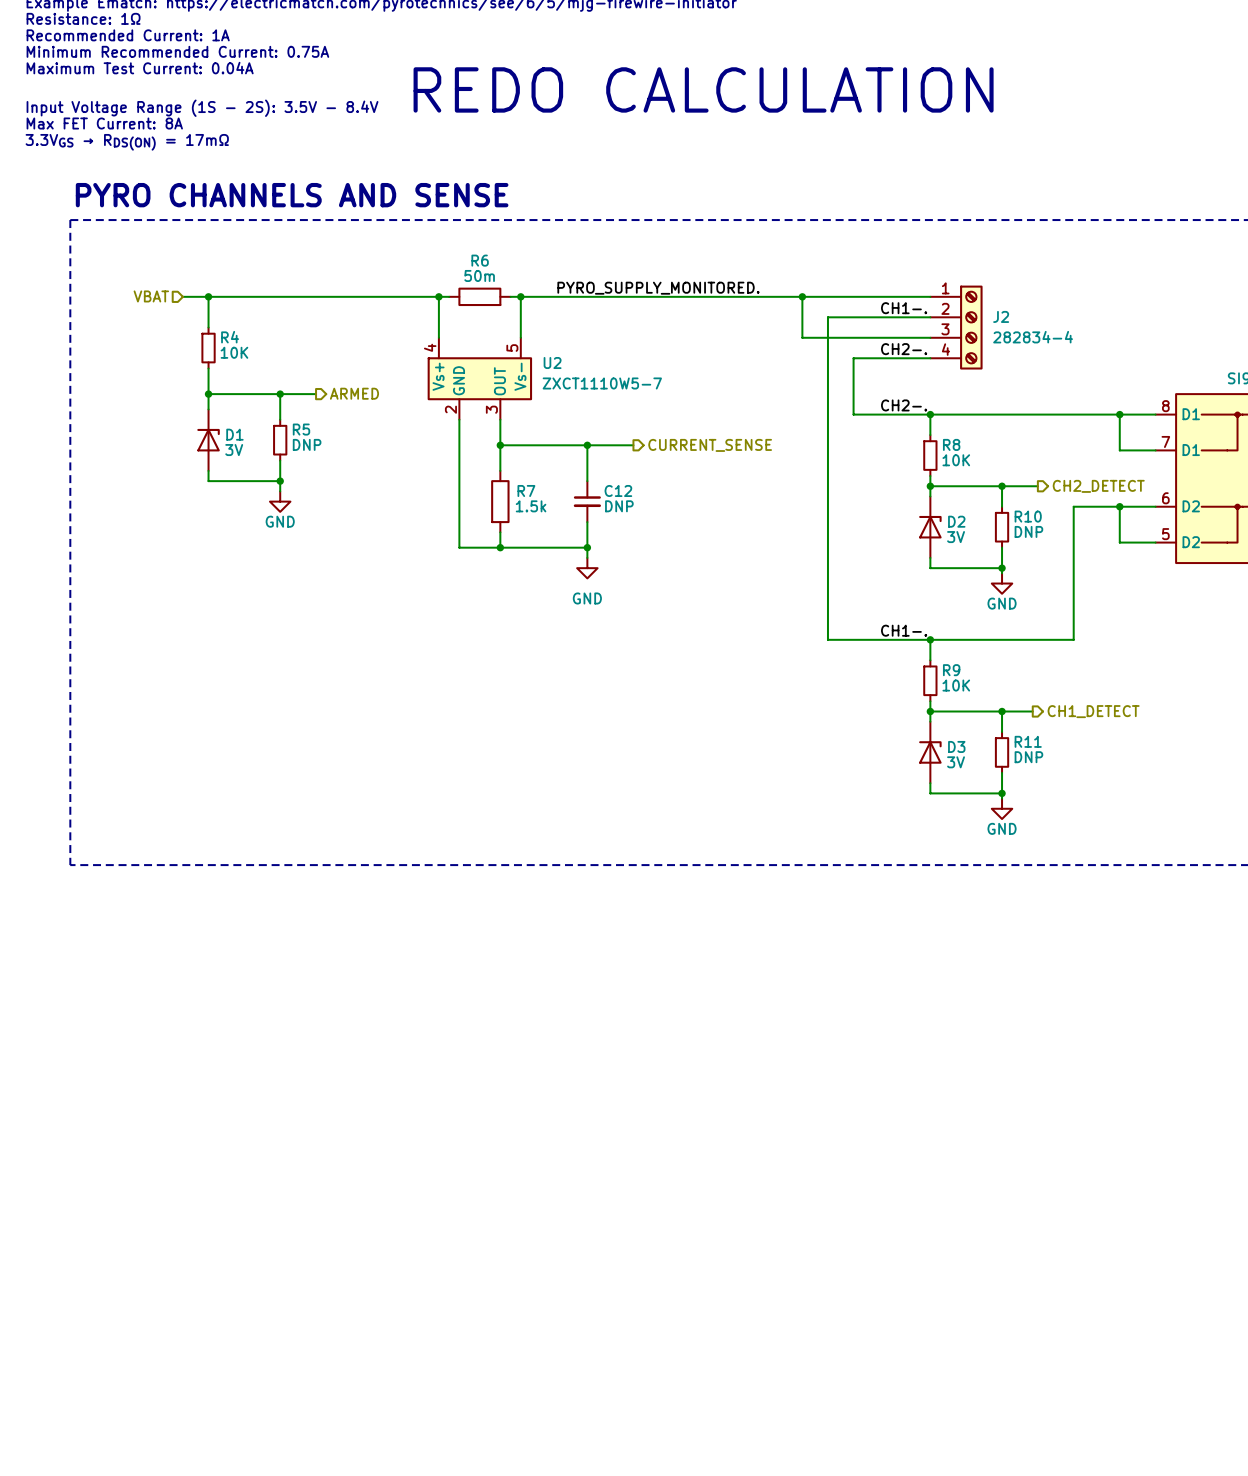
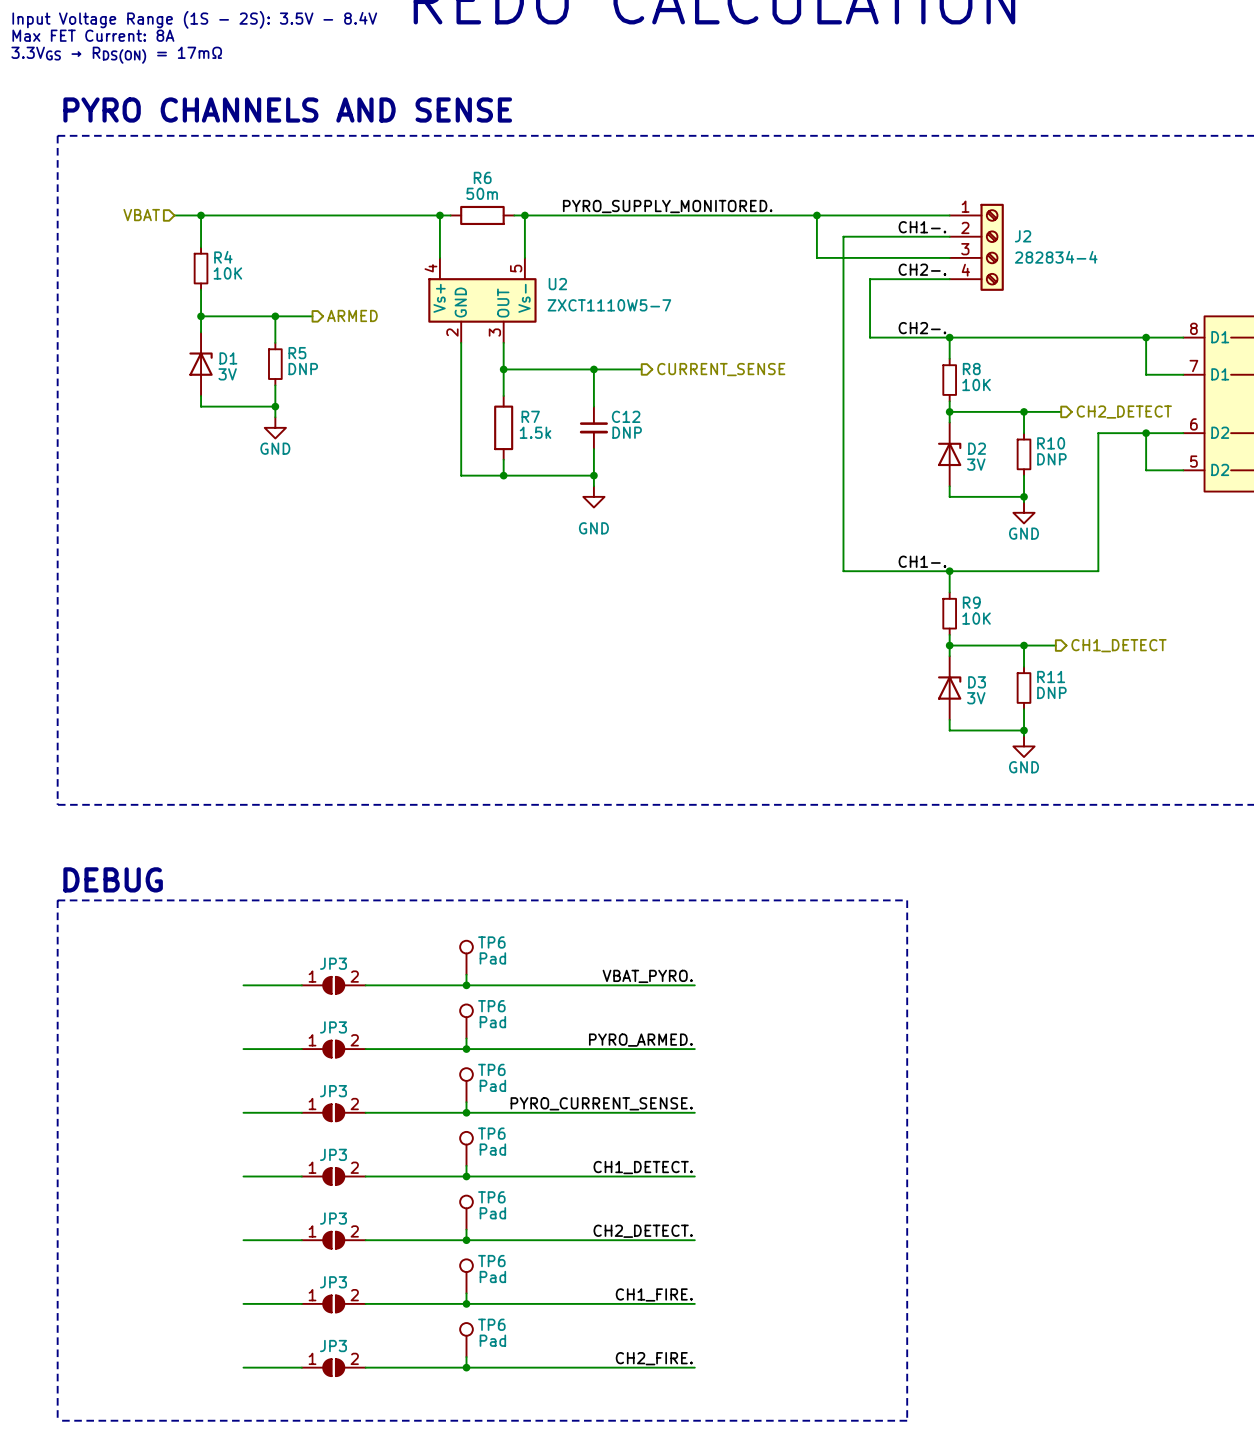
text: none -> DEBUG (113, 879)
line: none -> (57, 900) (907, 900) (907, 1420) (57, 1420) (57, 900)
TP6: none -> Pad (466, 957)
wire: none -> (466, 974) (466, 985)
label: none -> VBAT_PYRO. (647, 976)
wire: none -> (243, 985) (301, 985)
JP3: none -> (333, 985)
wire: none -> (365, 985) (694, 985)
junction: none -> (466, 985)
TP6: none -> Pad (466, 1021)
wire: none -> (466, 1038) (466, 1049)
label: none -> PYRO_ARMED. (640, 1040)
wire: none -> (243, 1049) (301, 1049)
JP3: none -> (333, 1049)
wire: none -> (365, 1049) (694, 1049)
junction: none -> (466, 1049)
TP6: none -> Pad (466, 1085)
wire: none -> (466, 1102) (466, 1112)
label: none -> PYRO_CURRENT_SENSE. (601, 1103)
wire: none -> (243, 1112) (301, 1112)
JP3: none -> (333, 1112)
wire: none -> (365, 1112) (694, 1112)
junction: none -> (466, 1112)
TP6: none -> Pad (466, 1148)
wire: none -> (466, 1165) (466, 1176)
label: none -> CH1_DETECT. (643, 1167)
wire: none -> (243, 1176) (301, 1176)
JP3: none -> (333, 1176)
wire: none -> (365, 1176) (694, 1176)
junction: none -> (466, 1176)
TP6: none -> Pad (466, 1212)
wire: none -> (466, 1229) (466, 1240)
label: none -> CH2_DETECT. (643, 1231)
wire: none -> (243, 1240) (301, 1240)
JP3: none -> (333, 1240)
wire: none -> (365, 1240) (694, 1240)
junction: none -> (466, 1240)
TP6: none -> Pad (466, 1276)
wire: none -> (466, 1293) (466, 1303)
label: none -> CH1_FIRE. (654, 1294)
wire: none -> (243, 1303) (301, 1303)
JP3: none -> (333, 1303)
wire: none -> (365, 1303) (694, 1303)
junction: none -> (466, 1303)
TP6: none -> Pad (466, 1340)
wire: none -> (466, 1357) (466, 1367)
label: none -> CH2_FIRE. (654, 1358)
wire: none -> (243, 1367) (301, 1367)
JP3: none -> (333, 1367)
wire: none -> (365, 1367) (694, 1367)
junction: none -> (466, 1367)

